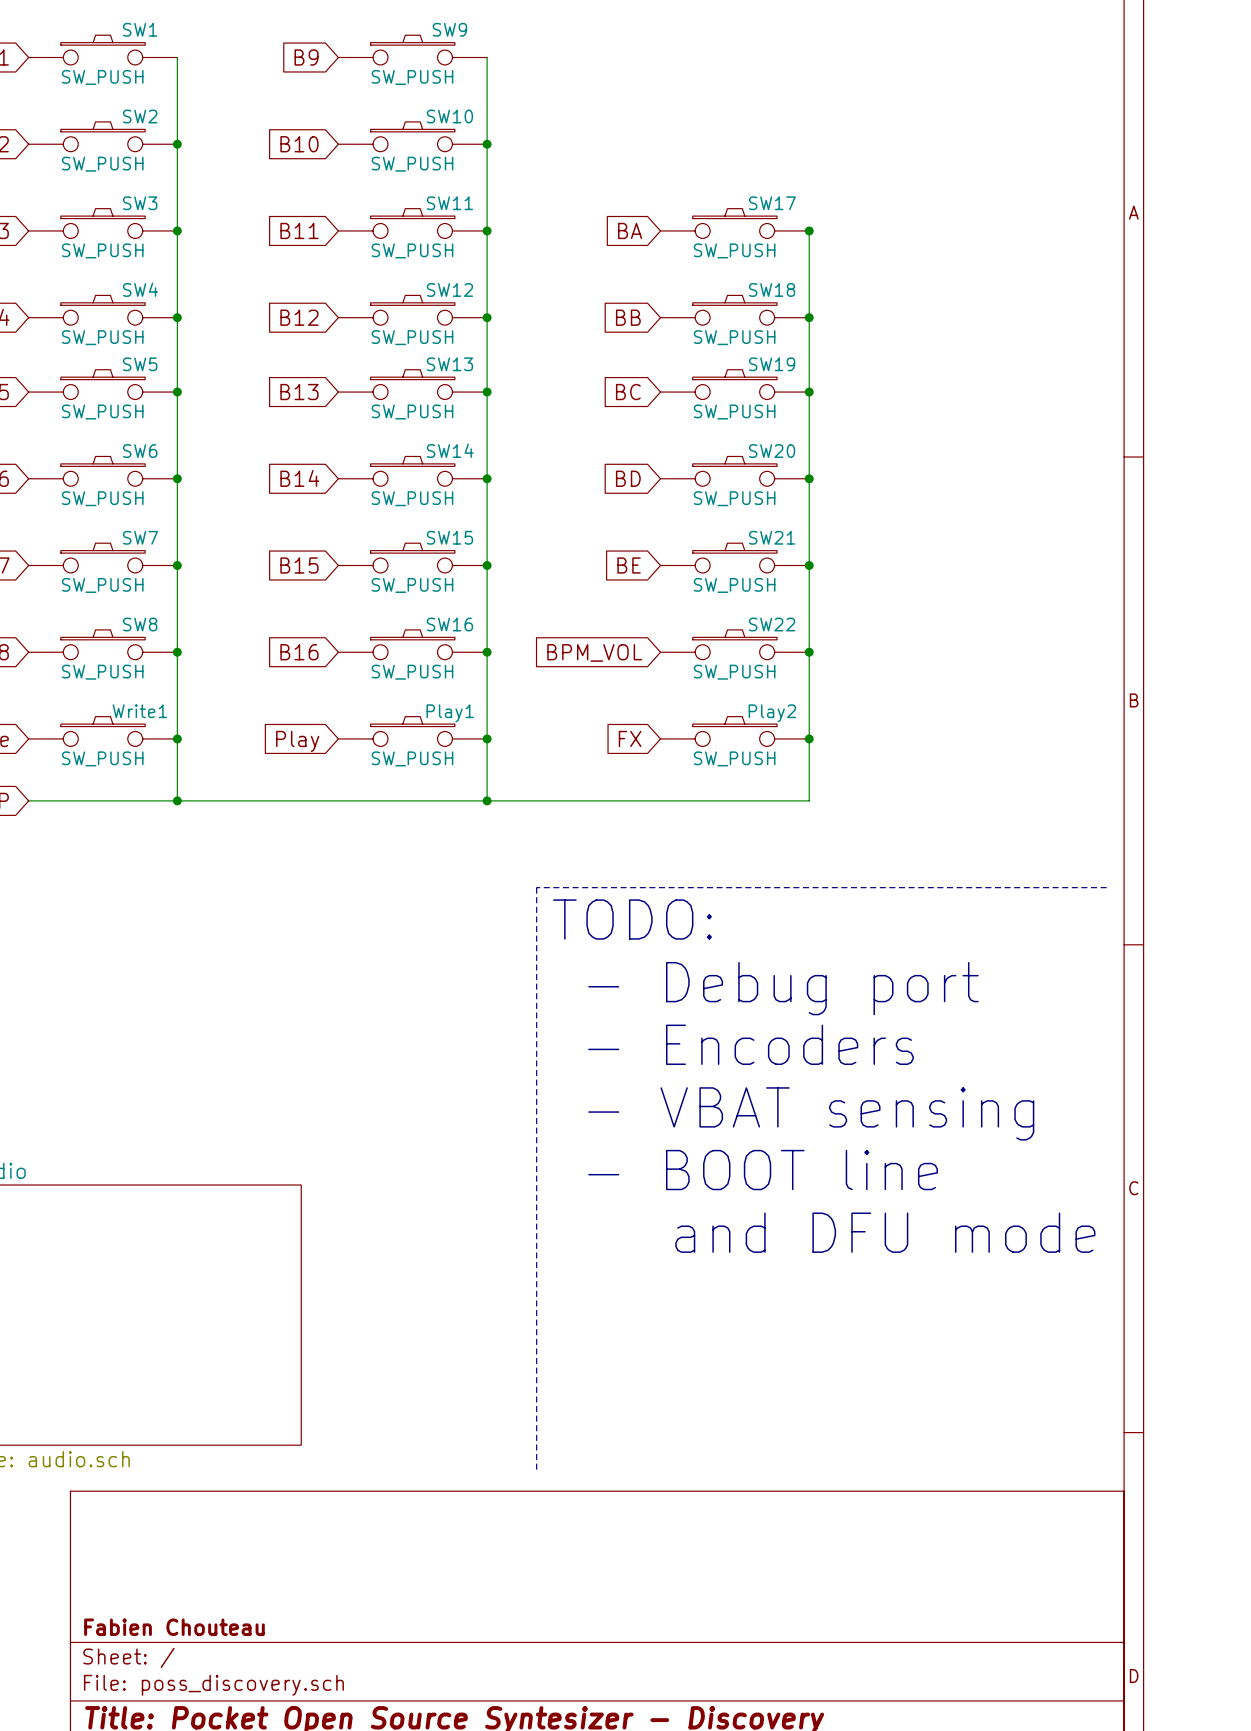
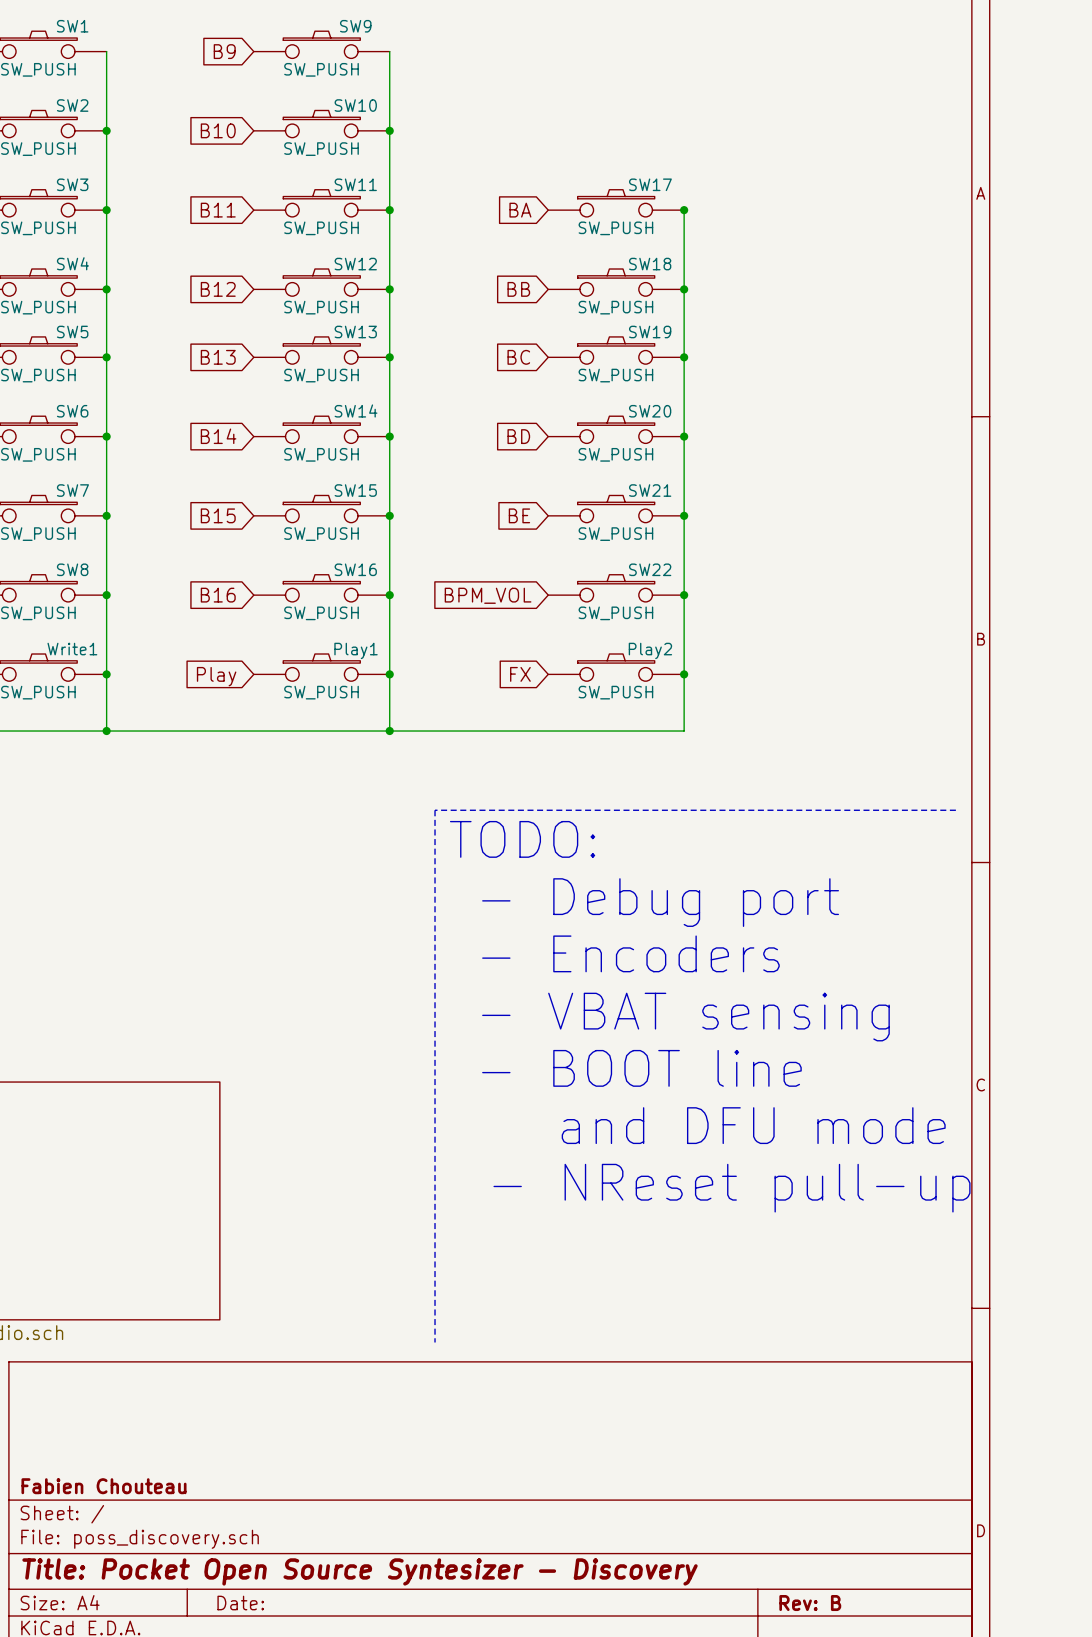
text: none -> - NReset pull-up (731, 1188)

